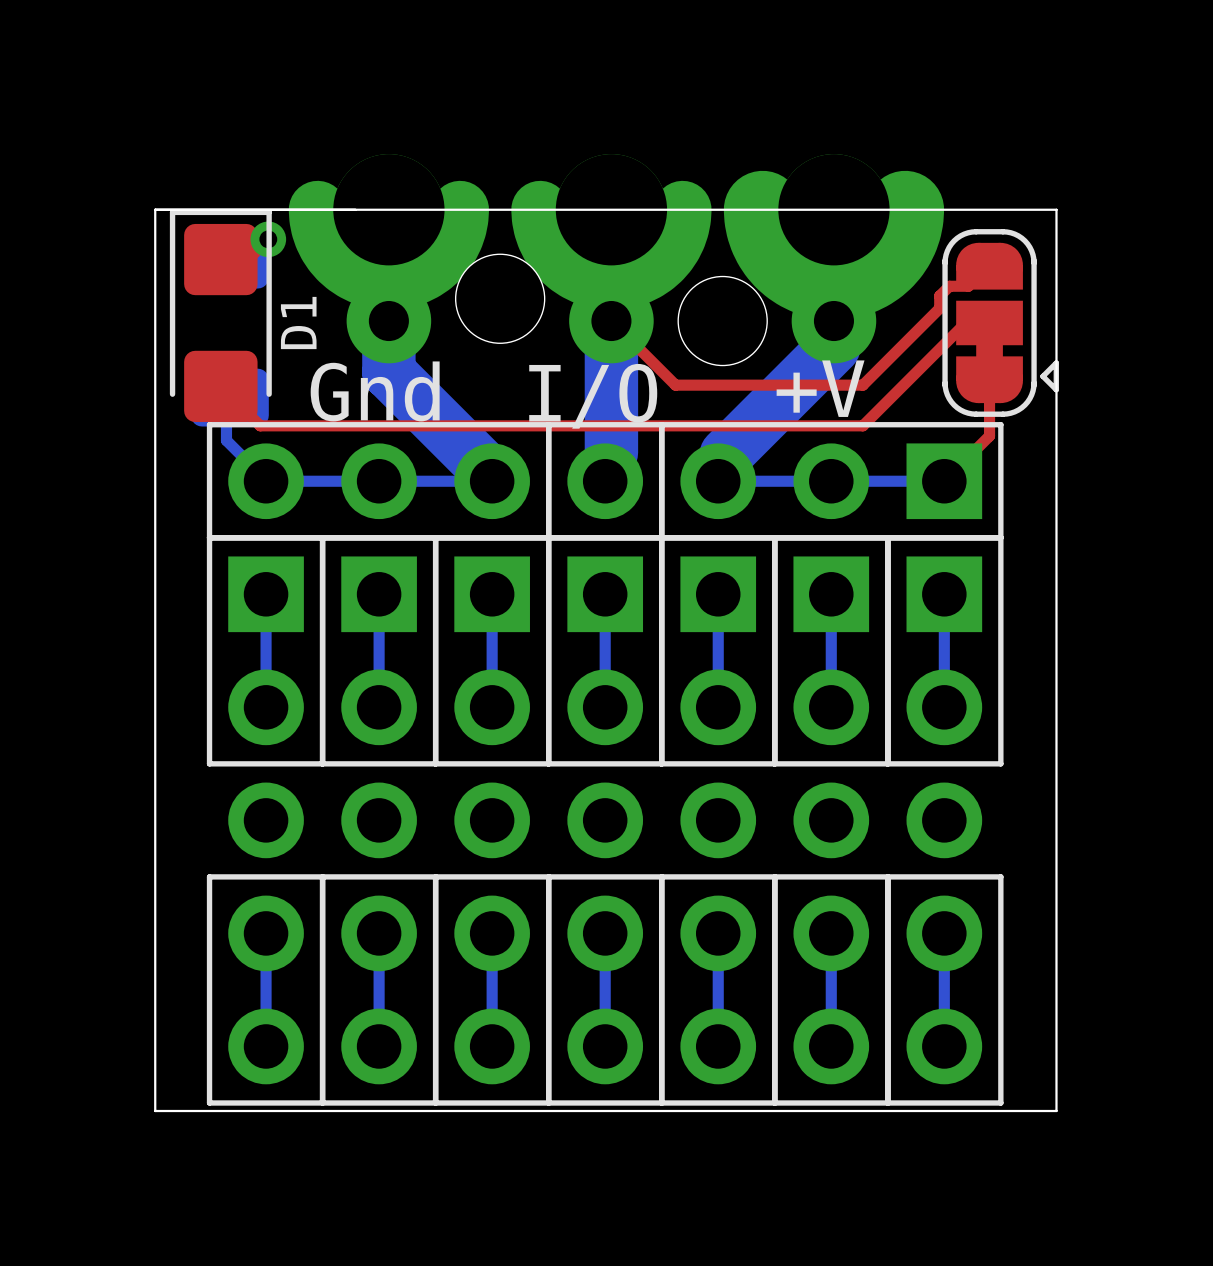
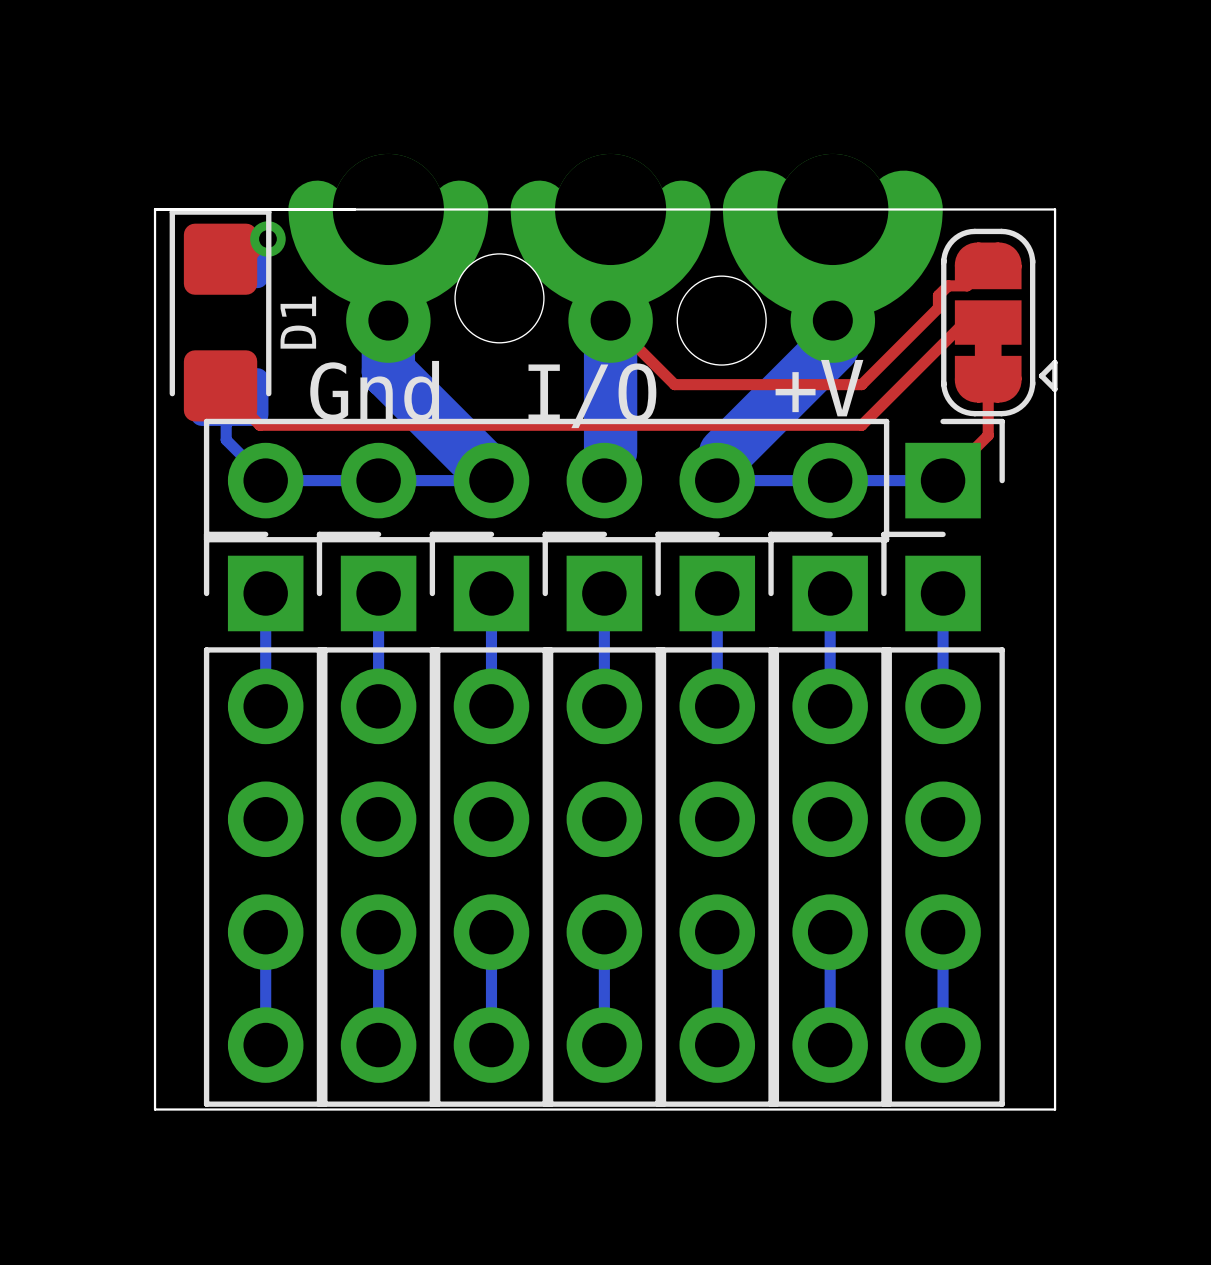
line: (209, 424) (1000, 424) (1000, 537) (209, 537) (209, 424) -> none
part footprint: [228, 443, 983, 520] -> [203, 418, 1005, 543]
part footprint: [206, 535, 326, 1106] -> [203, 531, 328, 1107]
part footprint: [319, 535, 439, 1106] -> [316, 531, 441, 1107]
part footprint: [432, 535, 552, 1106] -> [429, 531, 554, 1107]
part footprint: [546, 535, 665, 1106] -> [542, 531, 667, 1107]
part footprint: [659, 535, 778, 1106] -> [655, 531, 780, 1107]
part footprint: [772, 535, 891, 1106] -> [768, 531, 892, 1107]
part footprint: [885, 535, 1004, 1106] -> [881, 531, 1005, 1107]

